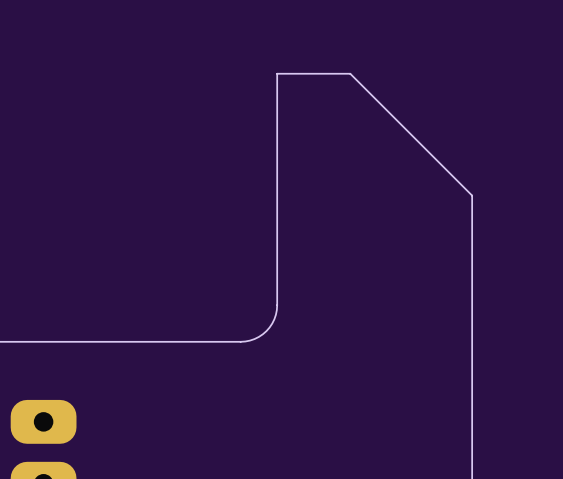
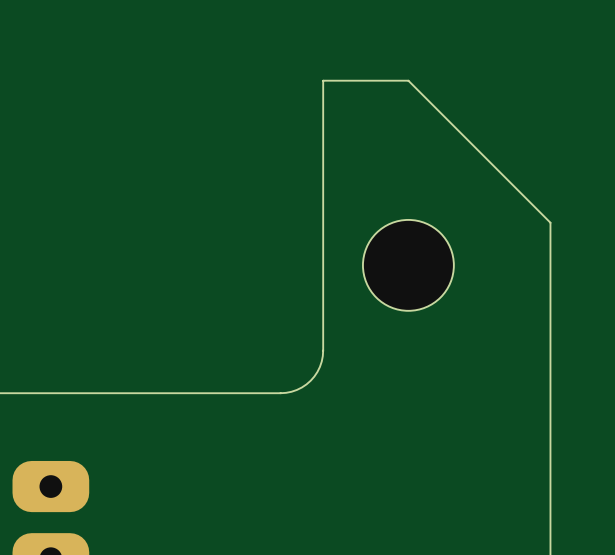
part: none -> (408, 265)

